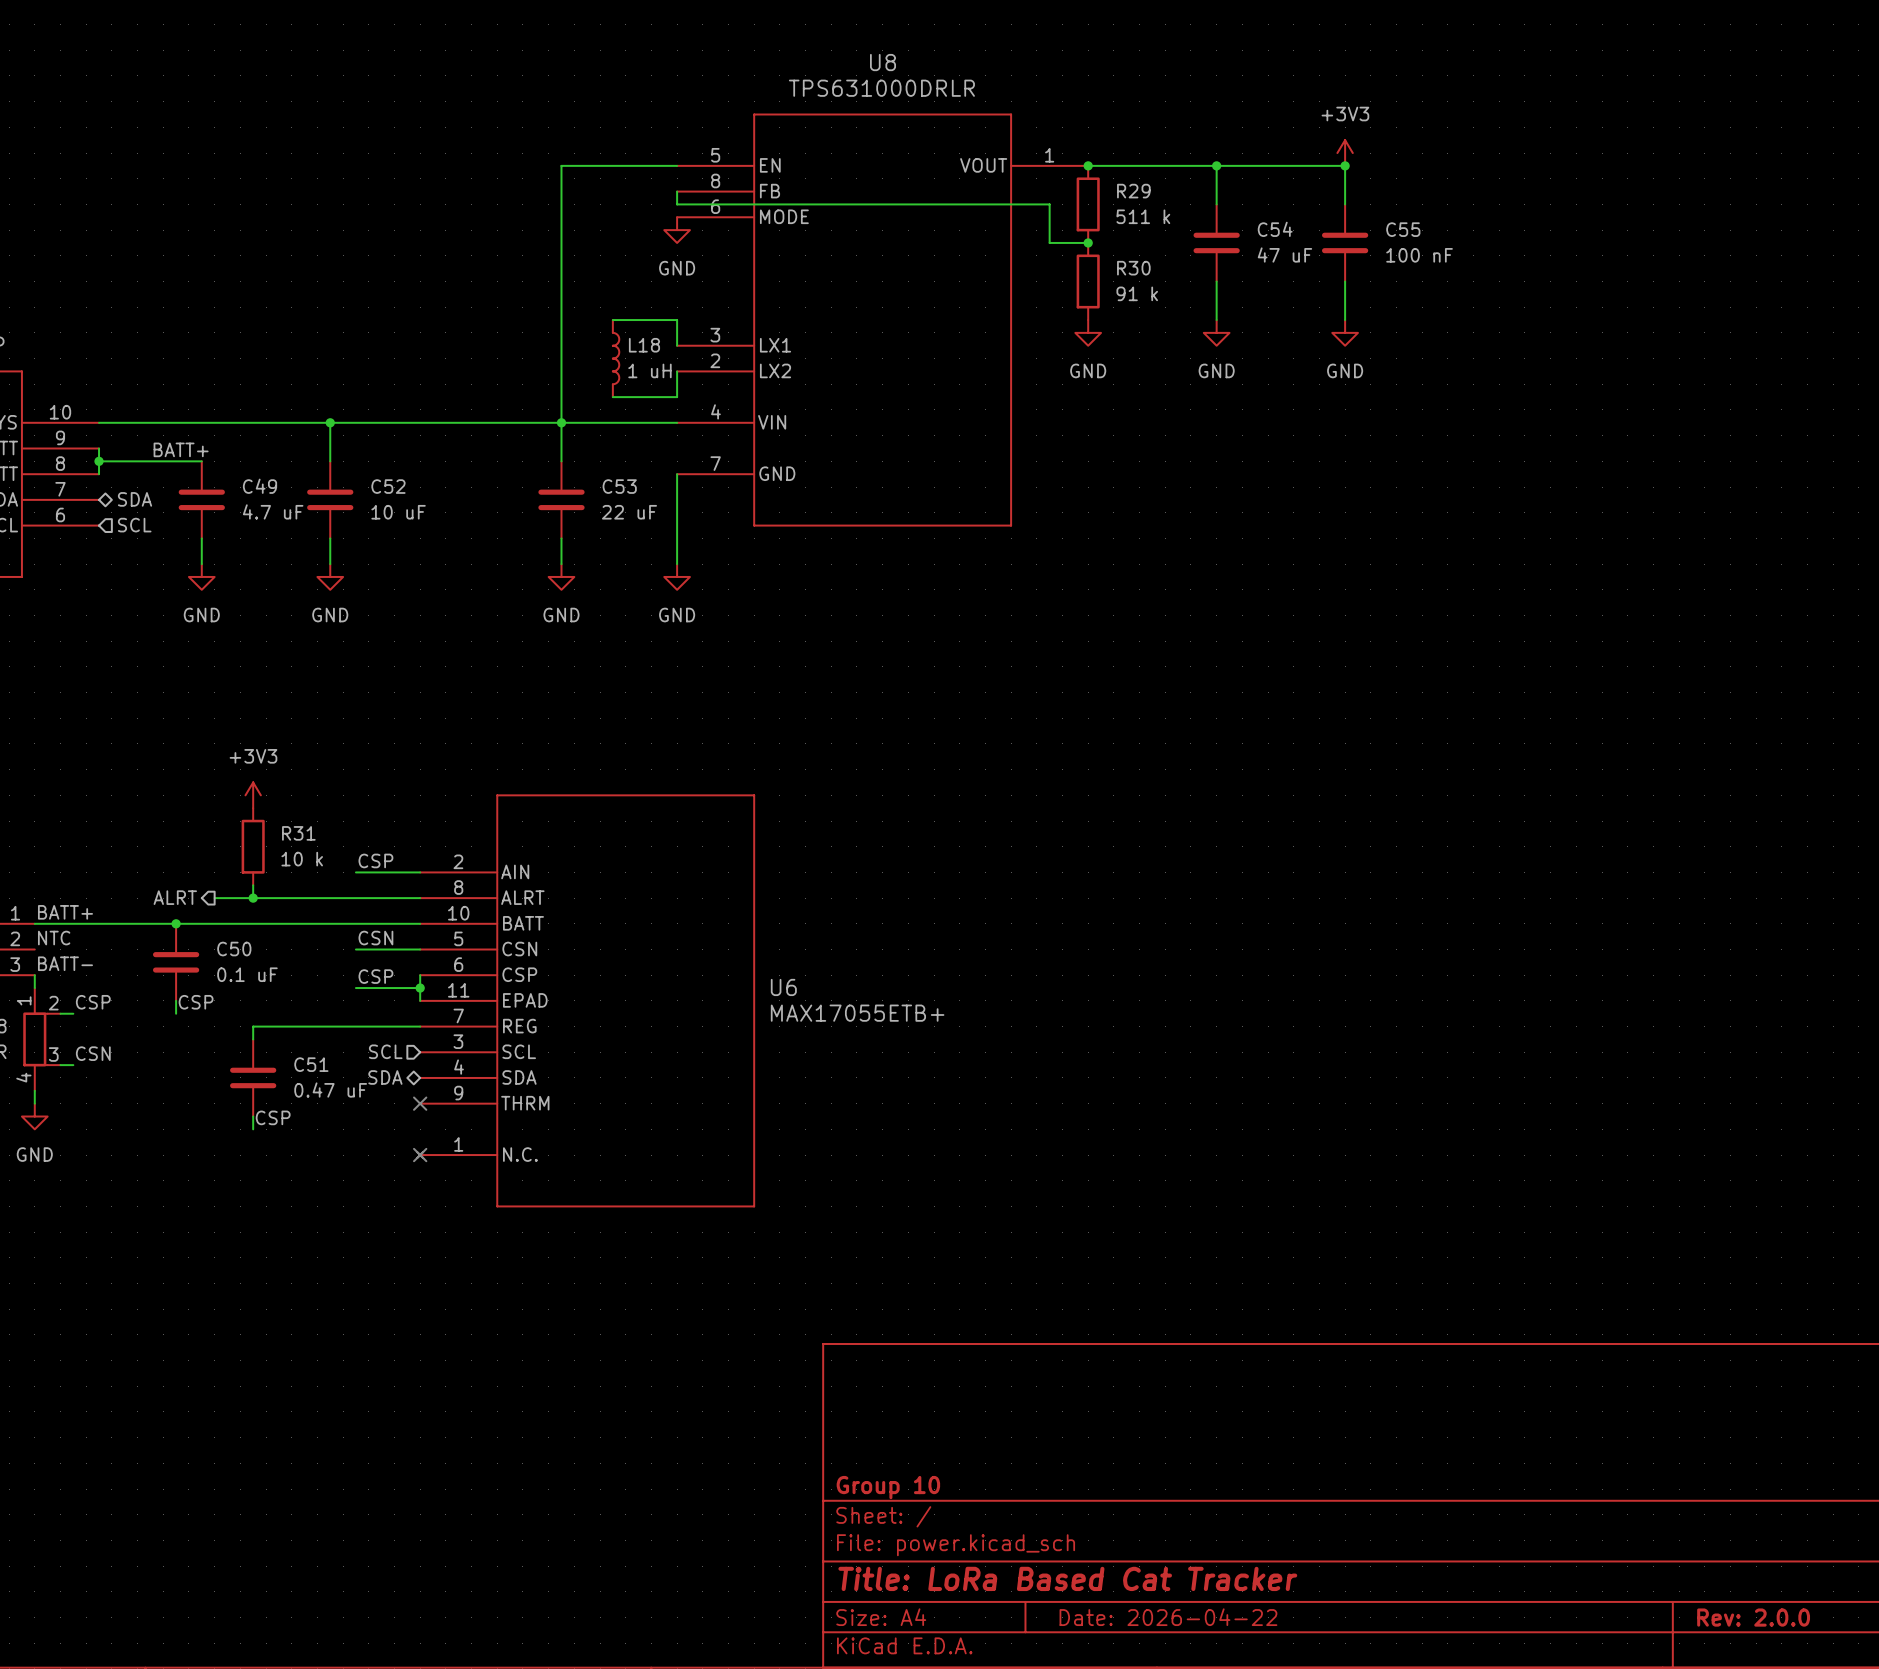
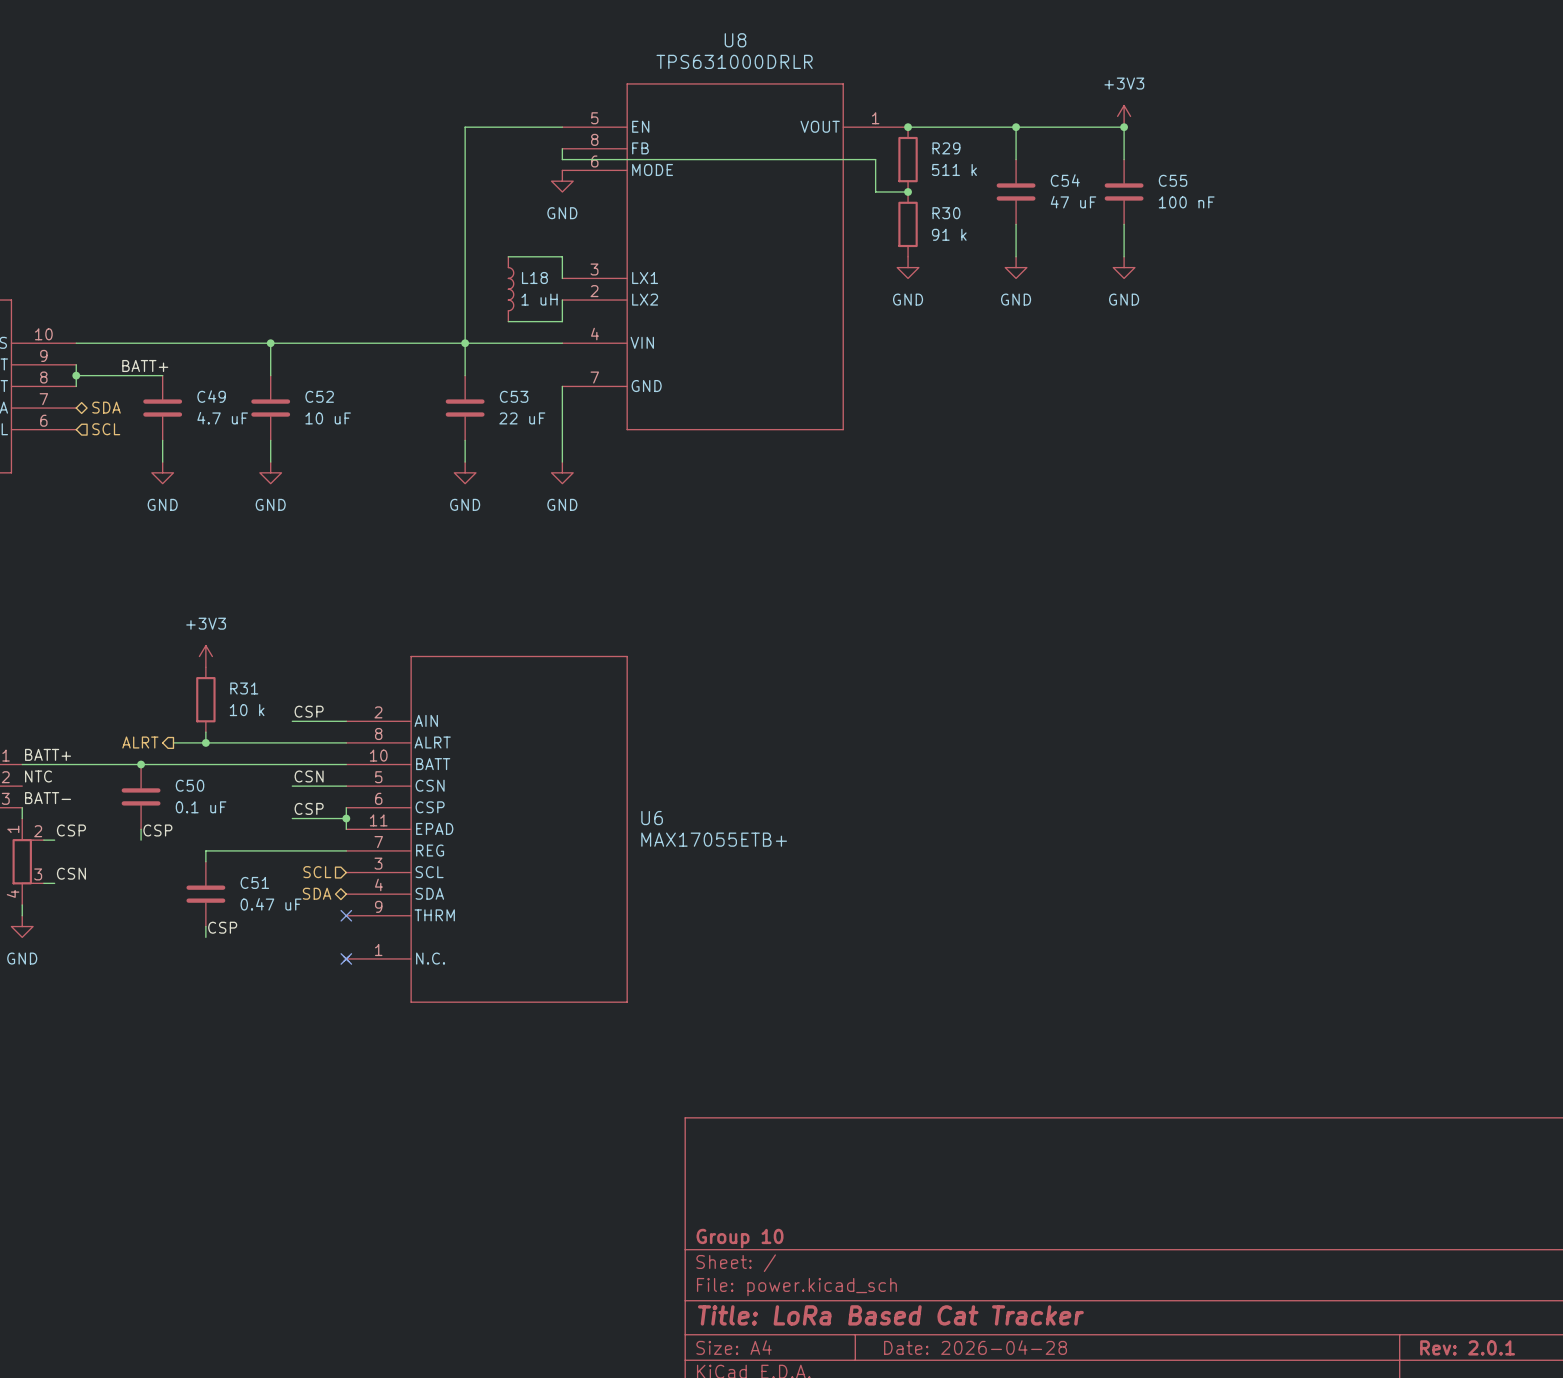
title block: Date: 2026-04-22 (1168, 1617) -> Date: 2026-04-28 (975, 1347)
title block: Rev: 2.0.0 (1753, 1617) -> Rev: 2.0.1 (1467, 1347)

